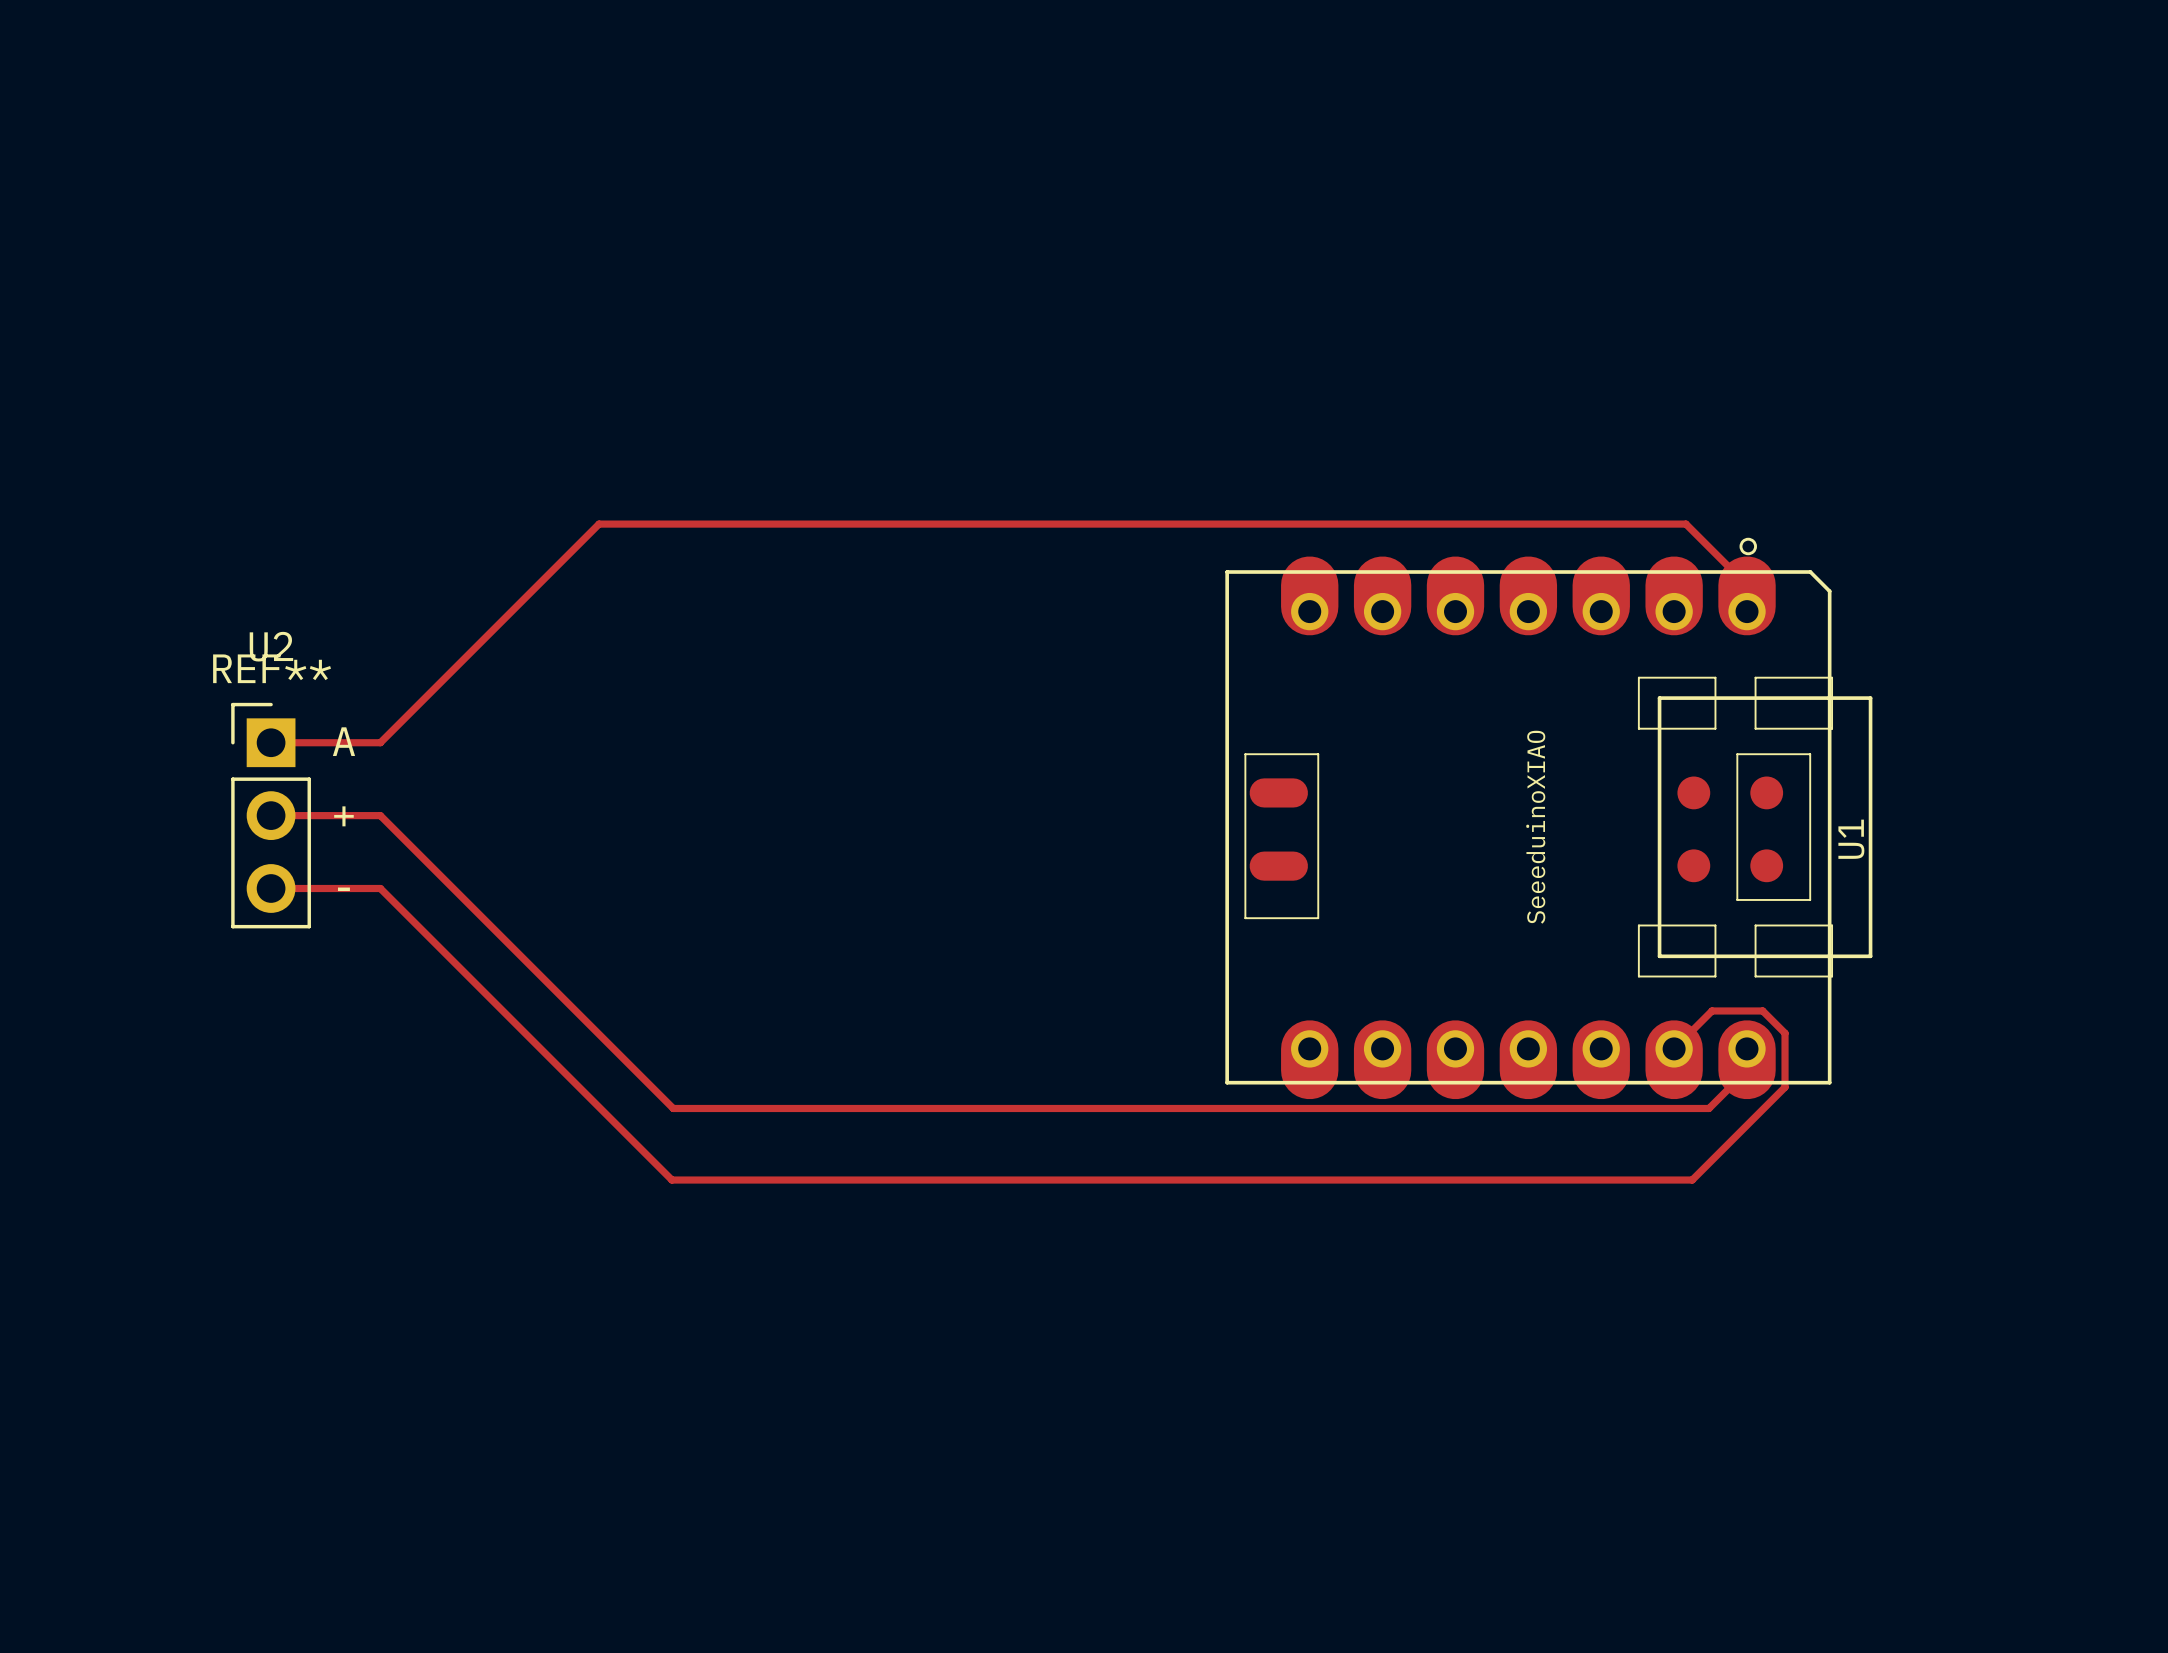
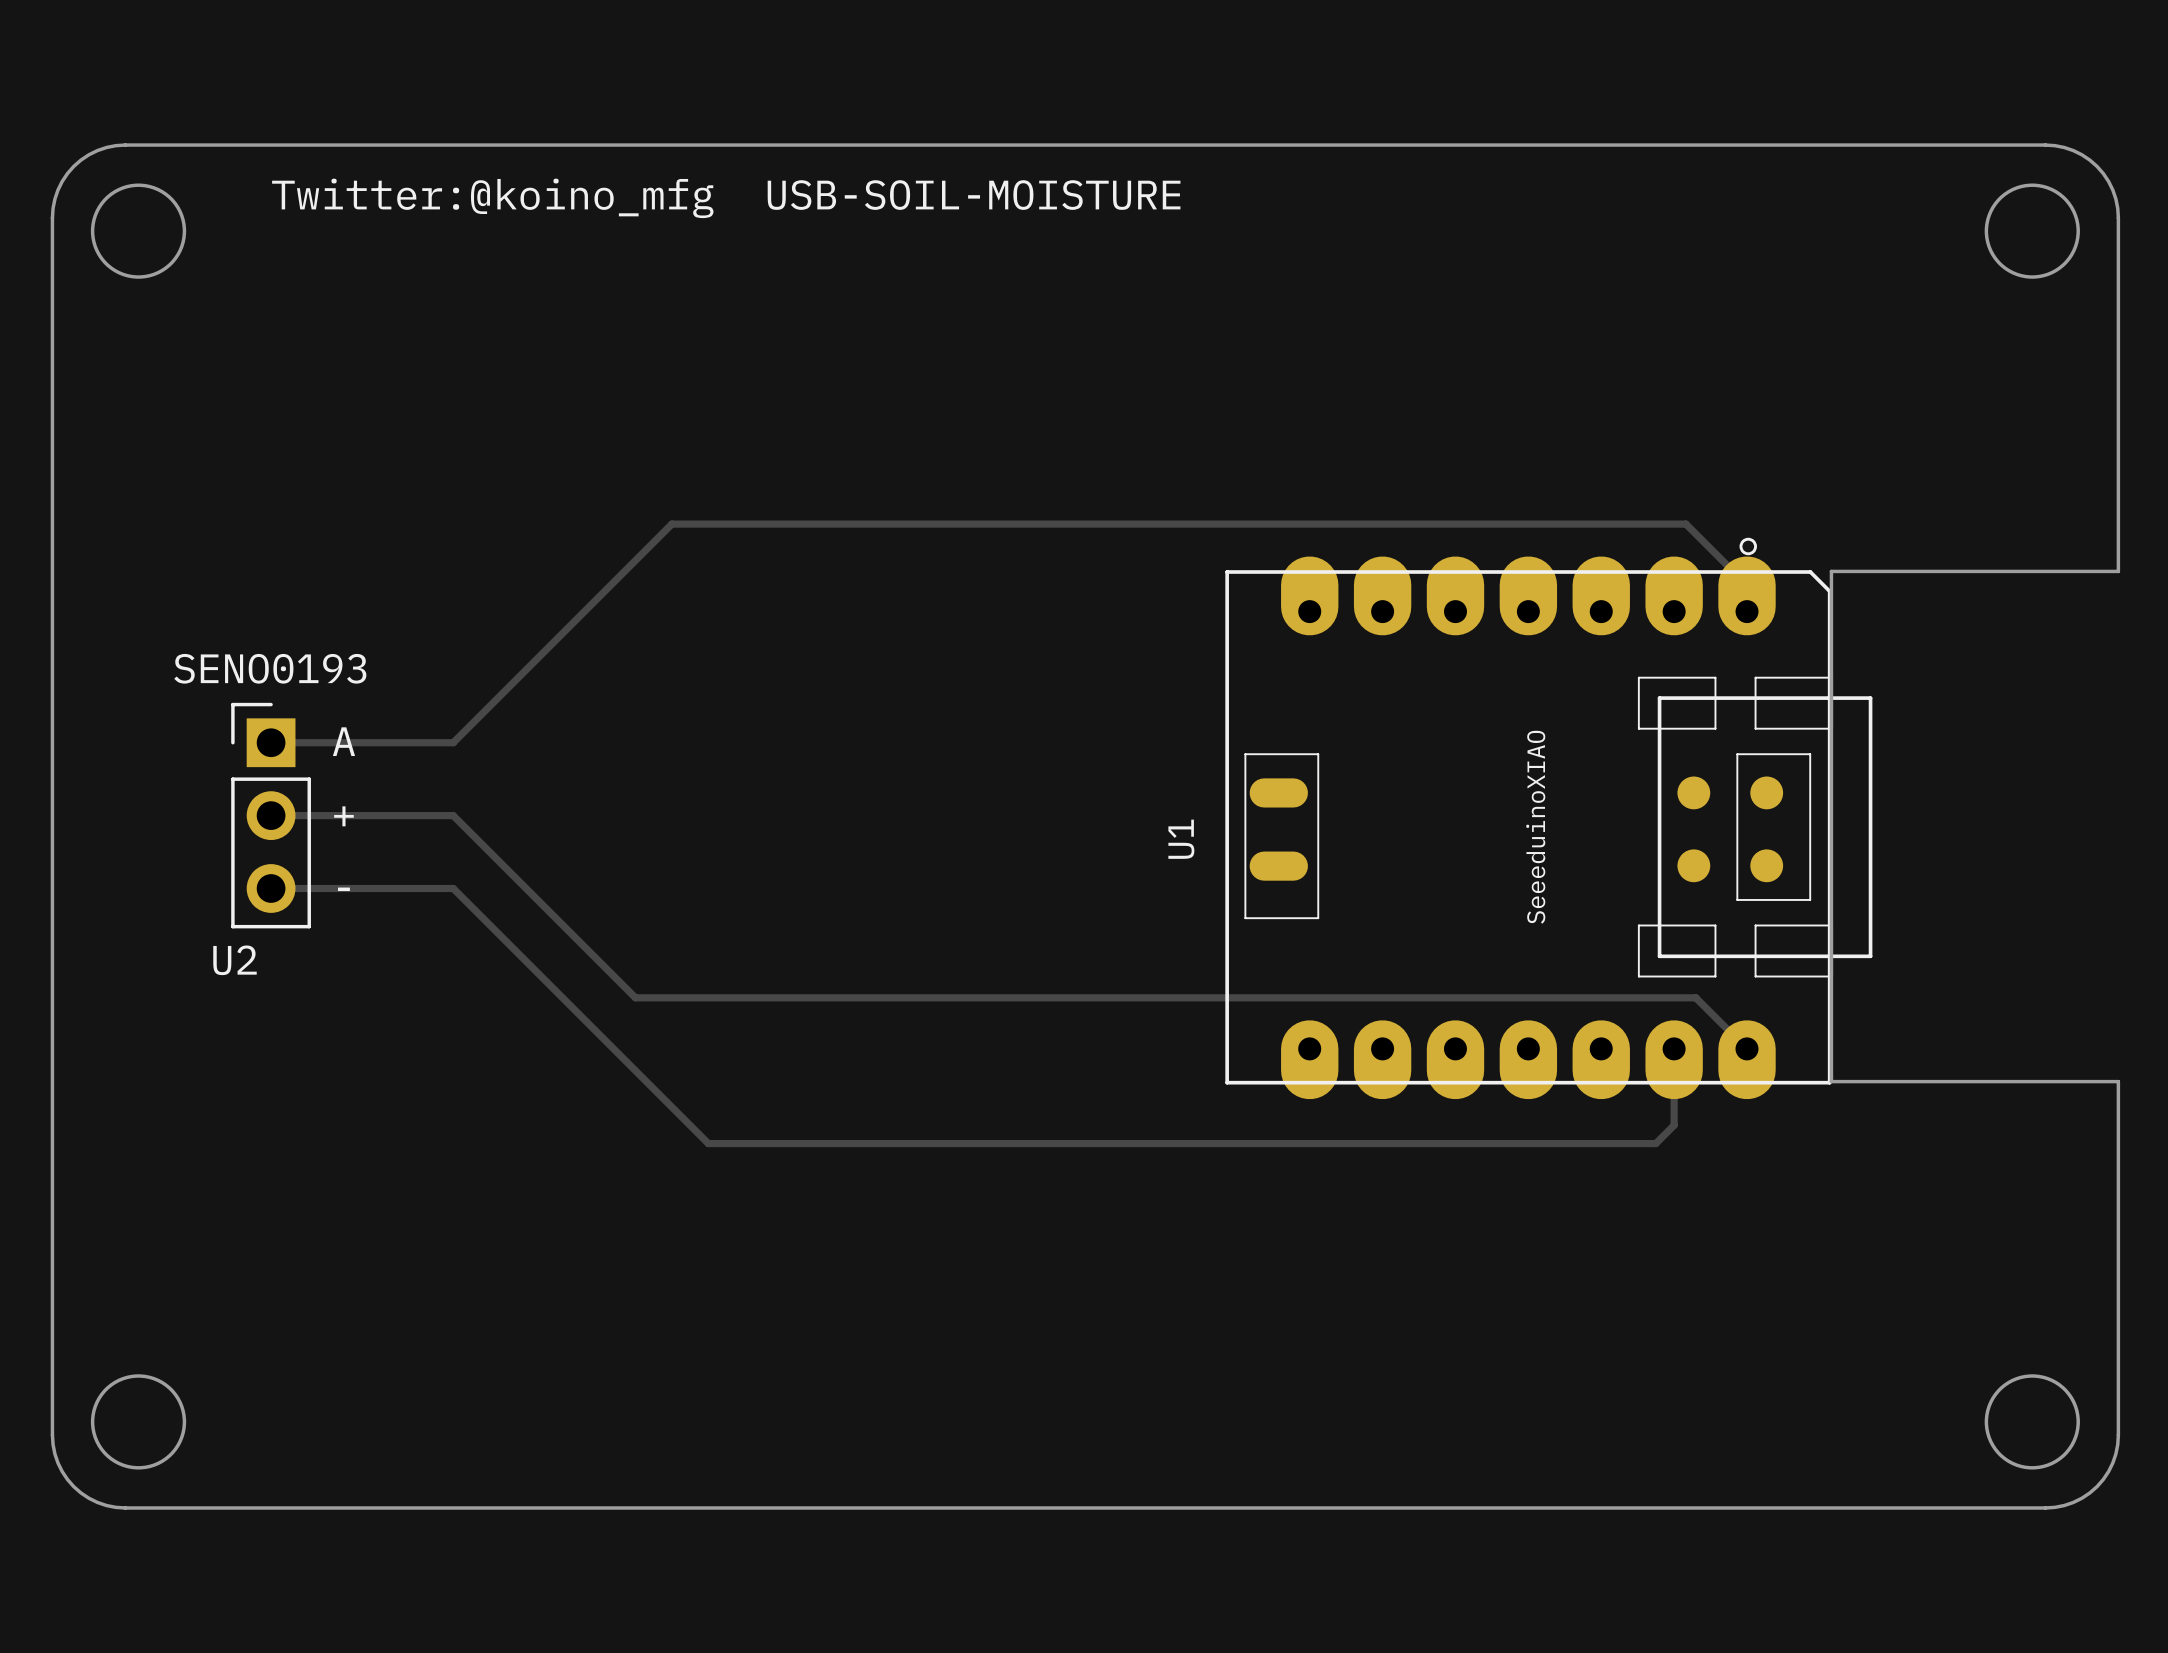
drawing: none -> [50, 143, 2121, 1510]
track: (671, 524) (599, 524) (380, 742) -> (671, 524) (453, 742) (380, 742)
U2 name position: U2 (271, 646) -> U2 (234, 960)
U2 text: REF** (272, 668) -> SENO0193 (270, 668)
track: (380, 815) (453, 888) -> (380, 888) (453, 888)
track: none -> (380, 815) (453, 815) (635, 997) (1695, 997) (1747, 1048) (1747, 1059)
U1 name position: U1 (1851, 839) -> U1 (1181, 839)
track: (380, 888) (671, 1180) (1692, 1180) (1785, 1087) (1785, 1033) (1762, 1010) (1712, 1010) (1674, 1048) -> none
track: (1747, 1070) (1709, 1108) (673, 1108) -> (1674, 1059) (1674, 1125) (1655, 1143) (708, 1143) (673, 1108)

